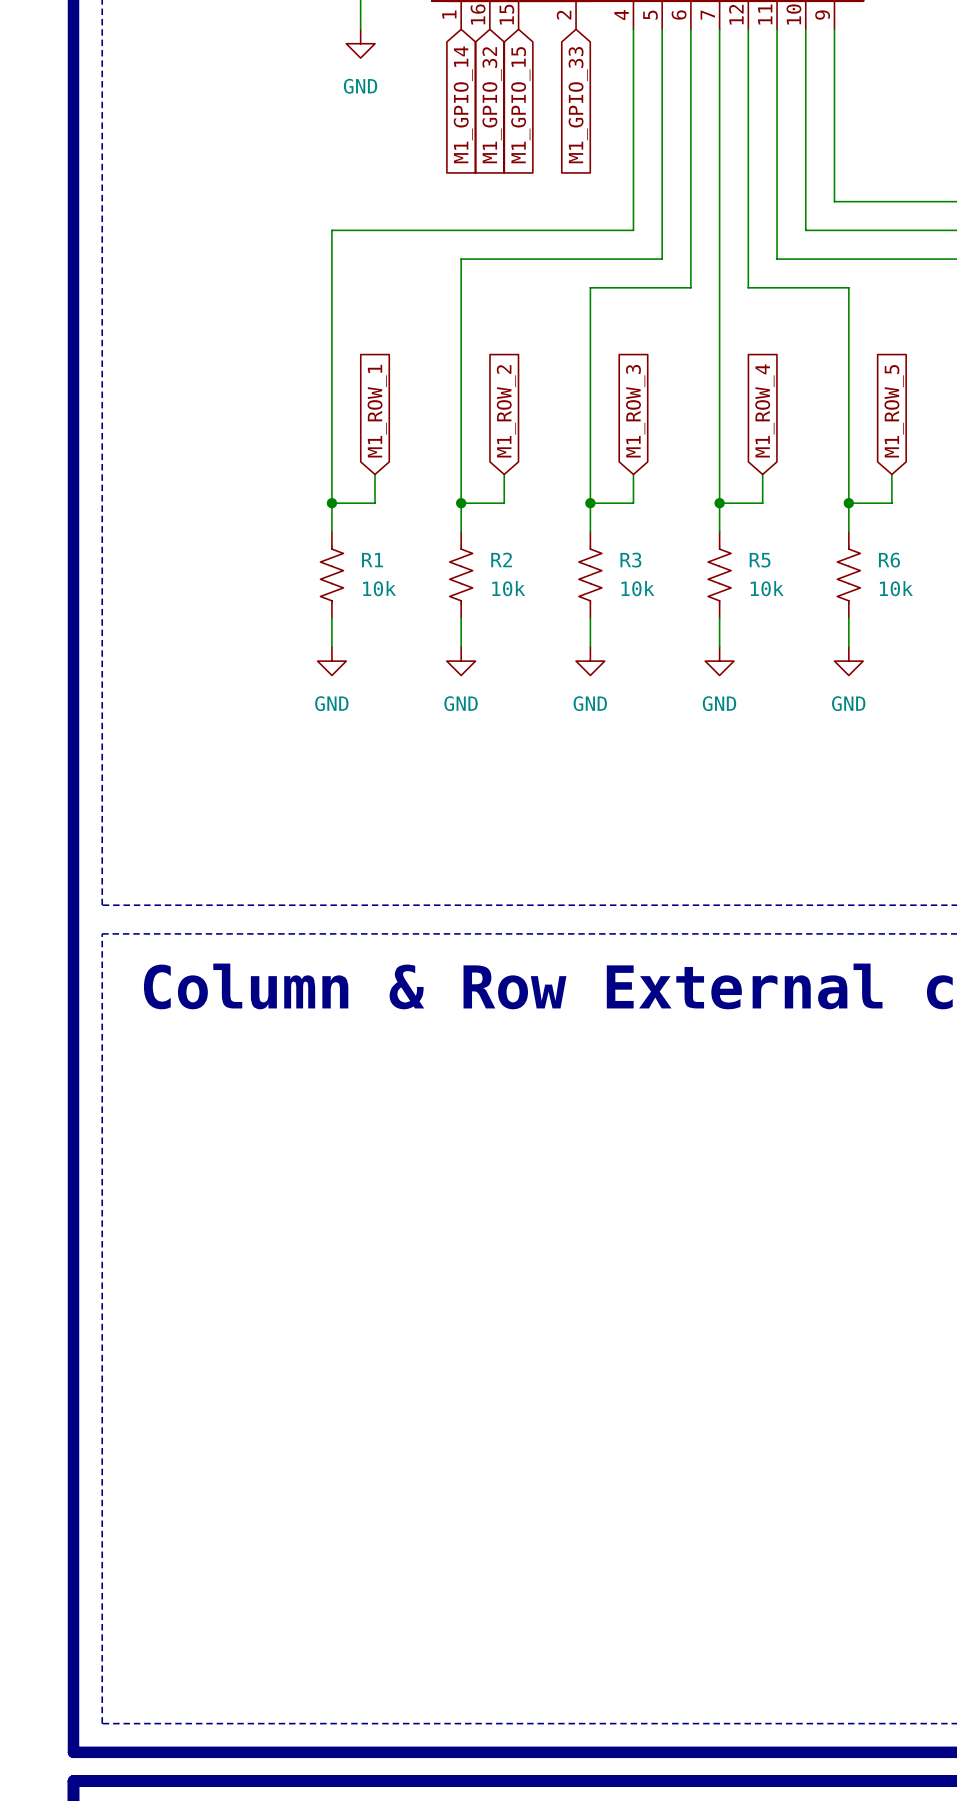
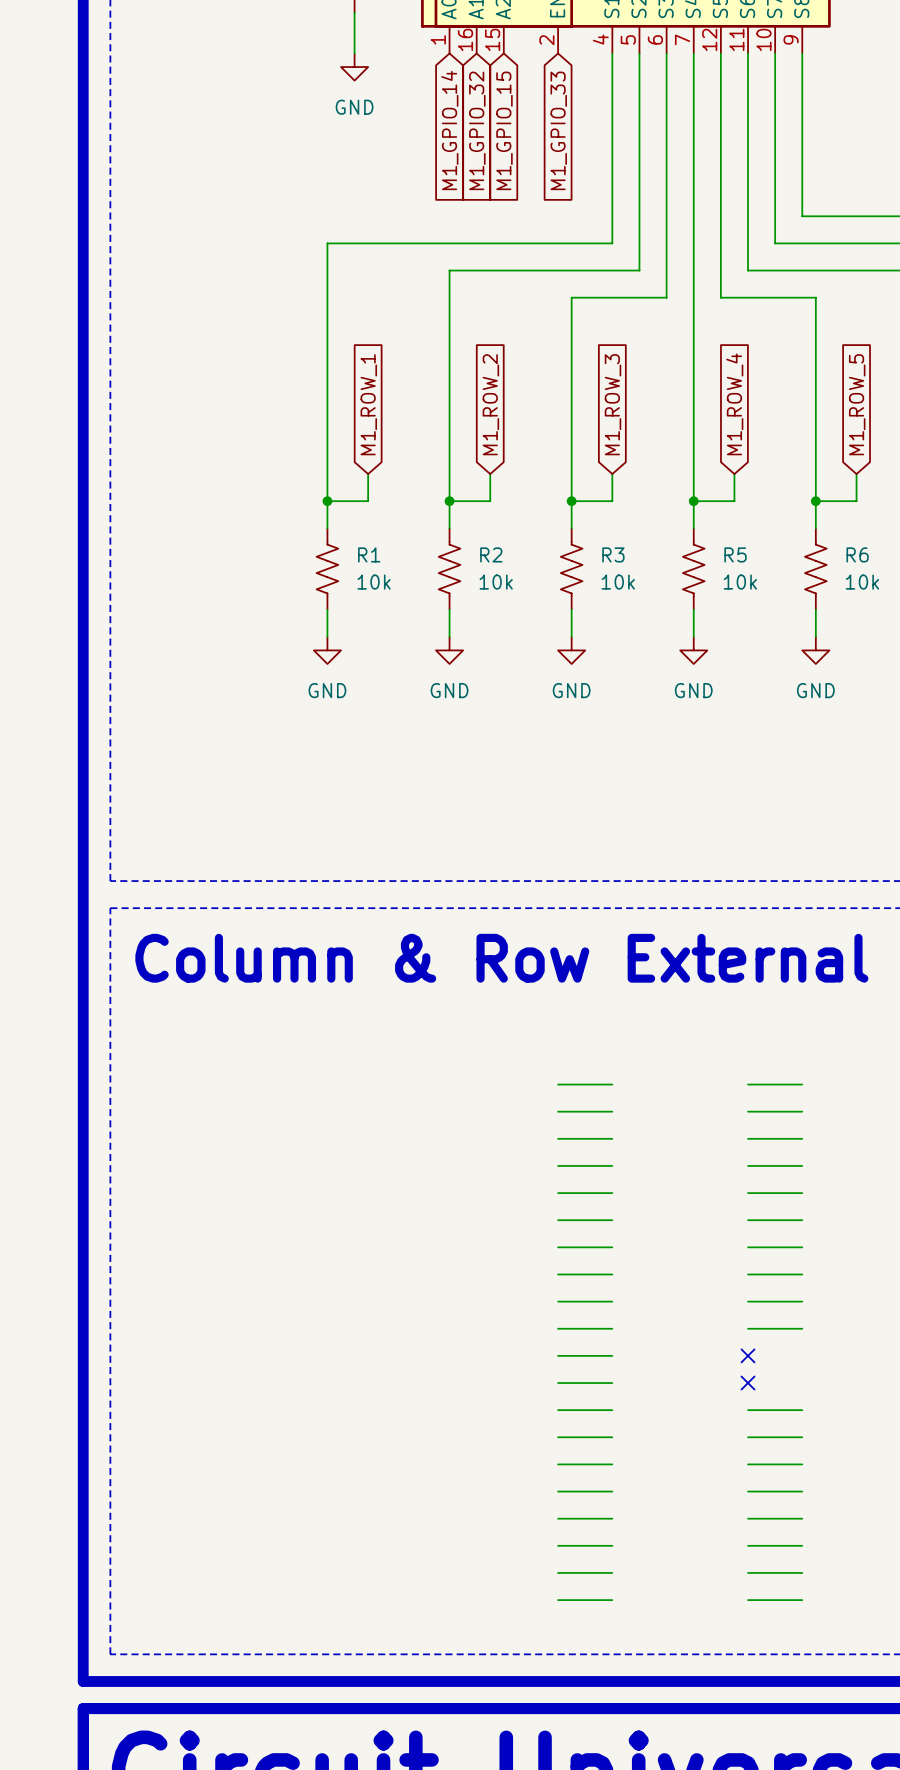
wire: none -> (558, 1084) (612, 1084)
wire: none -> (748, 1084) (802, 1084)
wire: none -> (558, 1111) (612, 1111)
wire: none -> (748, 1111) (802, 1111)
wire: none -> (558, 1138) (612, 1138)
wire: none -> (748, 1138) (802, 1138)
wire: none -> (558, 1165) (612, 1165)
wire: none -> (748, 1165) (802, 1165)
wire: none -> (558, 1193) (612, 1193)
wire: none -> (748, 1193) (802, 1193)
wire: none -> (558, 1220) (612, 1220)
wire: none -> (748, 1220) (802, 1220)
wire: none -> (558, 1247) (612, 1247)
wire: none -> (748, 1247) (802, 1247)
wire: none -> (558, 1274) (612, 1274)
wire: none -> (748, 1274) (802, 1274)
wire: none -> (558, 1301) (612, 1301)
wire: none -> (748, 1301) (802, 1301)
wire: none -> (558, 1328) (612, 1328)
wire: none -> (748, 1328) (802, 1328)
wire: none -> (558, 1355) (612, 1355)
no-connect mark: none -> (748, 1355)
wire: none -> (558, 1383) (612, 1383)
no-connect mark: none -> (748, 1383)
wire: none -> (558, 1410) (612, 1410)
wire: none -> (748, 1410) (802, 1410)
wire: none -> (558, 1437) (612, 1437)
wire: none -> (748, 1437) (802, 1437)
wire: none -> (558, 1464) (612, 1464)
wire: none -> (748, 1464) (802, 1464)
wire: none -> (558, 1491) (612, 1491)
wire: none -> (748, 1491) (802, 1491)
wire: none -> (558, 1518) (612, 1518)
wire: none -> (748, 1518) (802, 1518)
wire: none -> (558, 1545) (612, 1545)
wire: none -> (748, 1545) (802, 1545)
wire: none -> (558, 1572) (612, 1572)
wire: none -> (748, 1572) (802, 1572)
wire: none -> (558, 1600) (612, 1600)
wire: none -> (748, 1600) (802, 1600)

